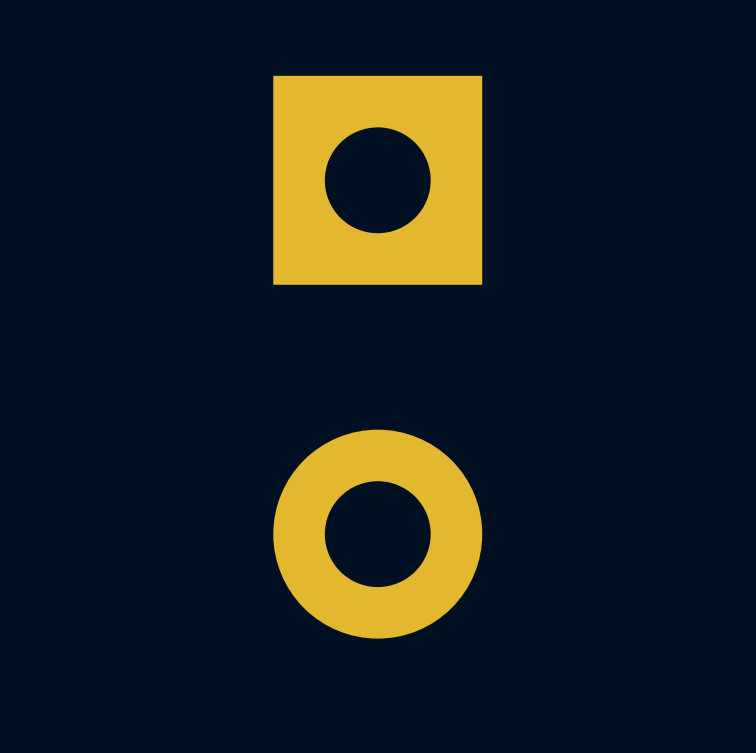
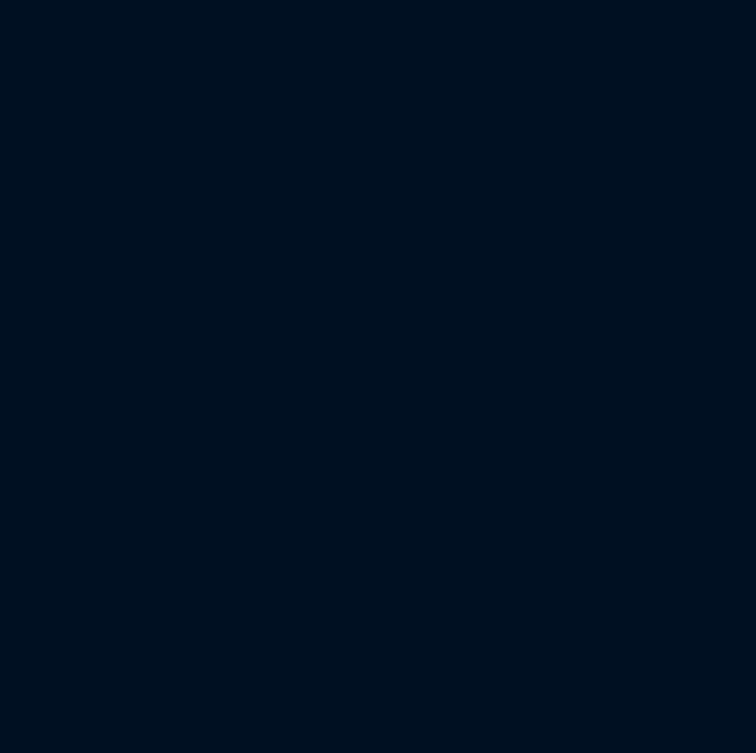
part: (377, 357) -> none

